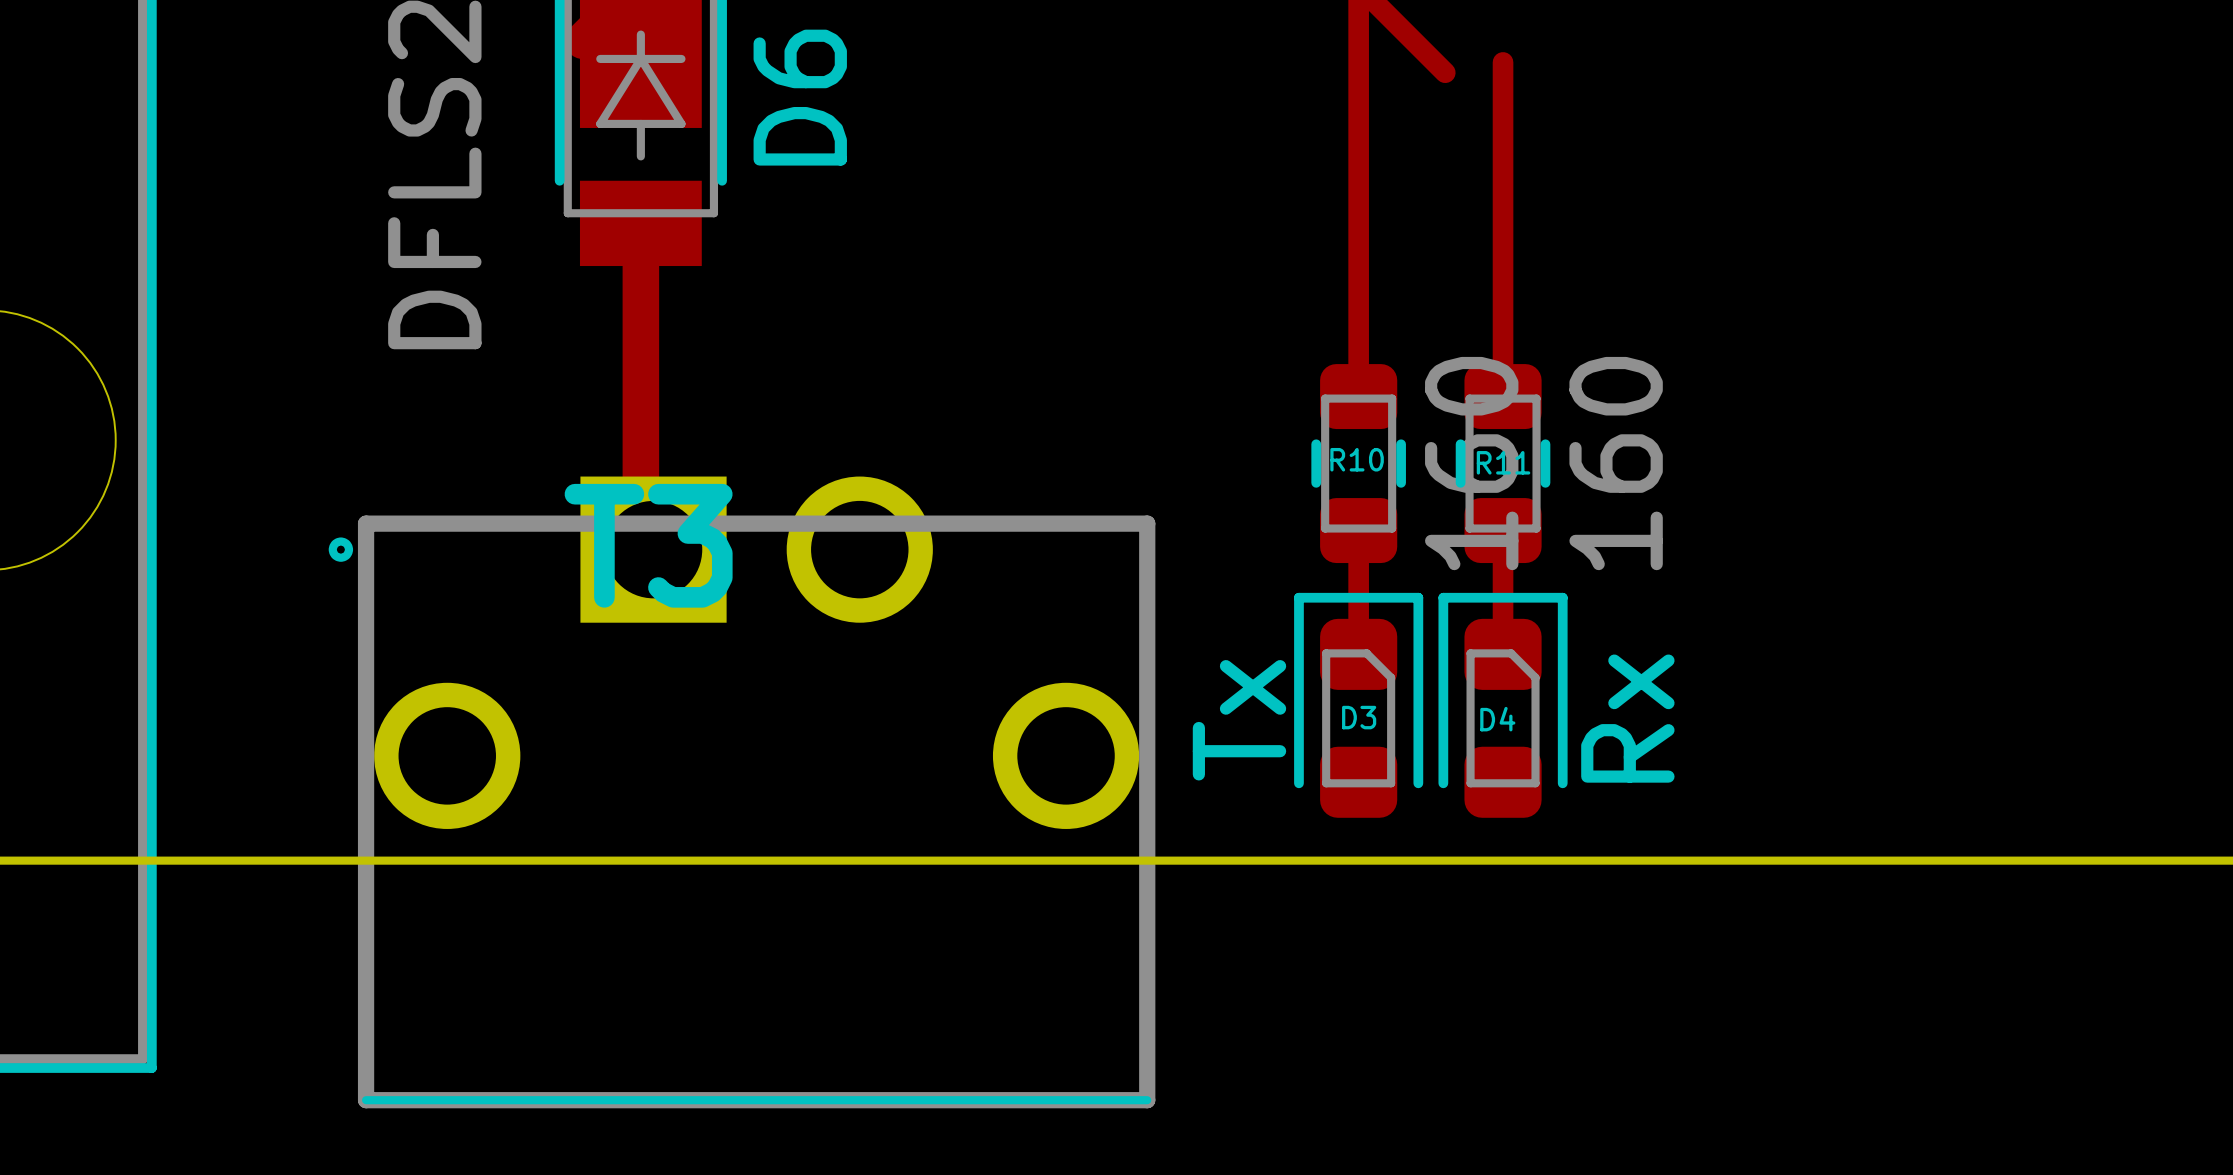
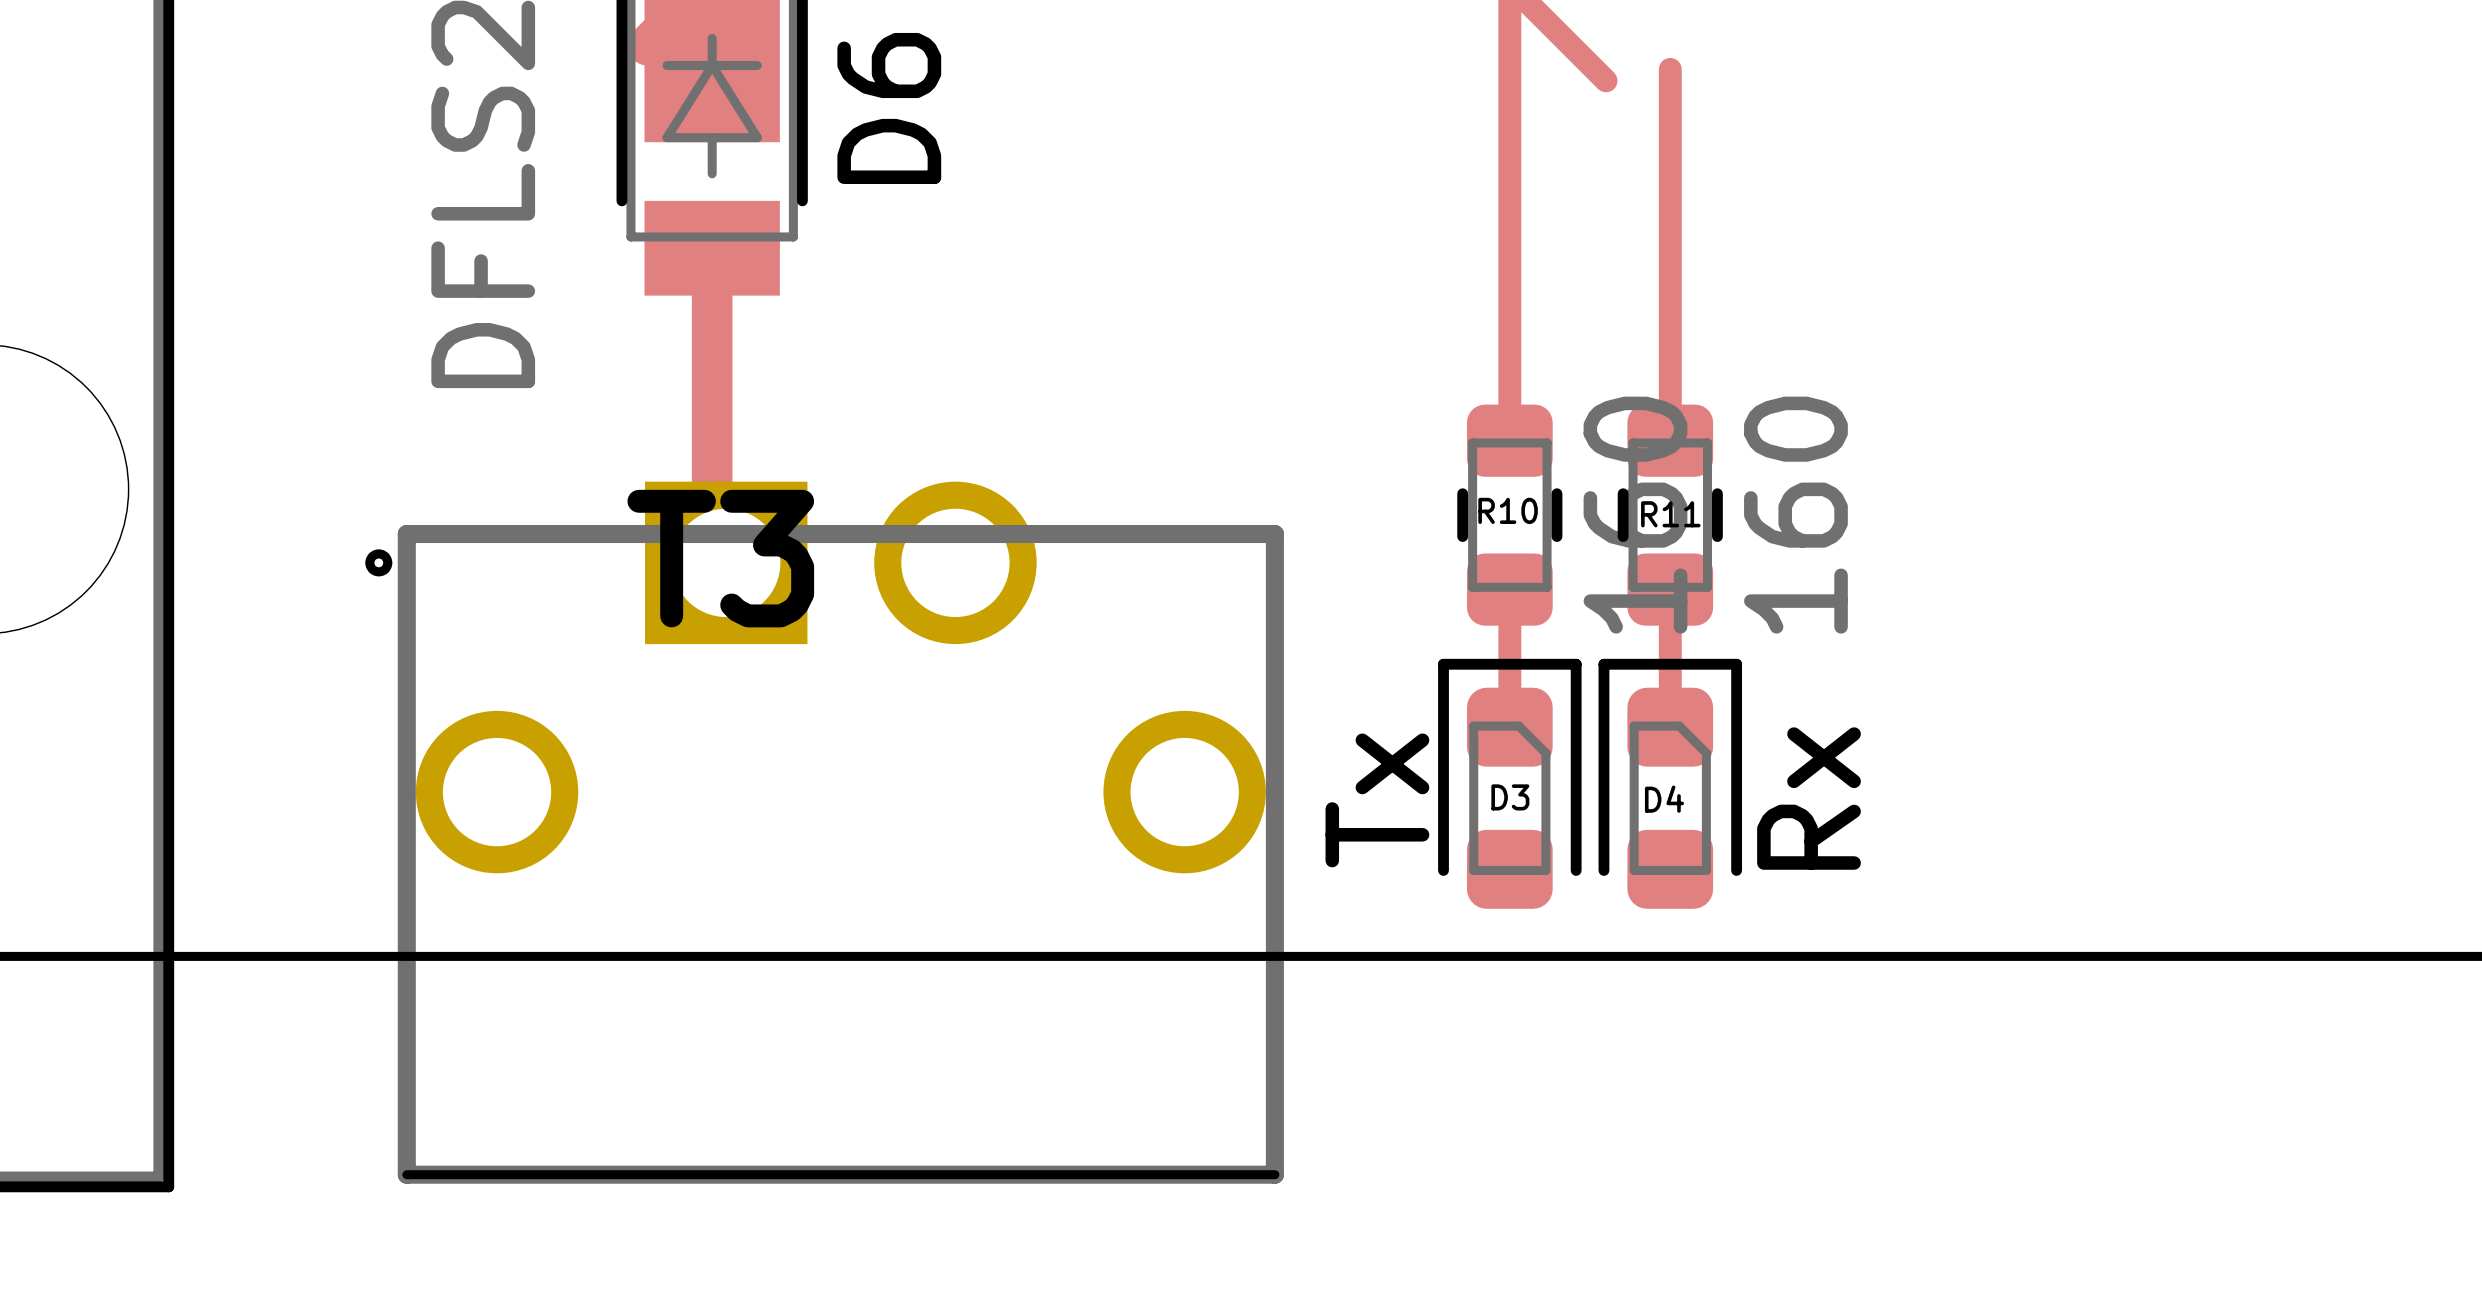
T3 position: (742, 792) -> (824, 832)

